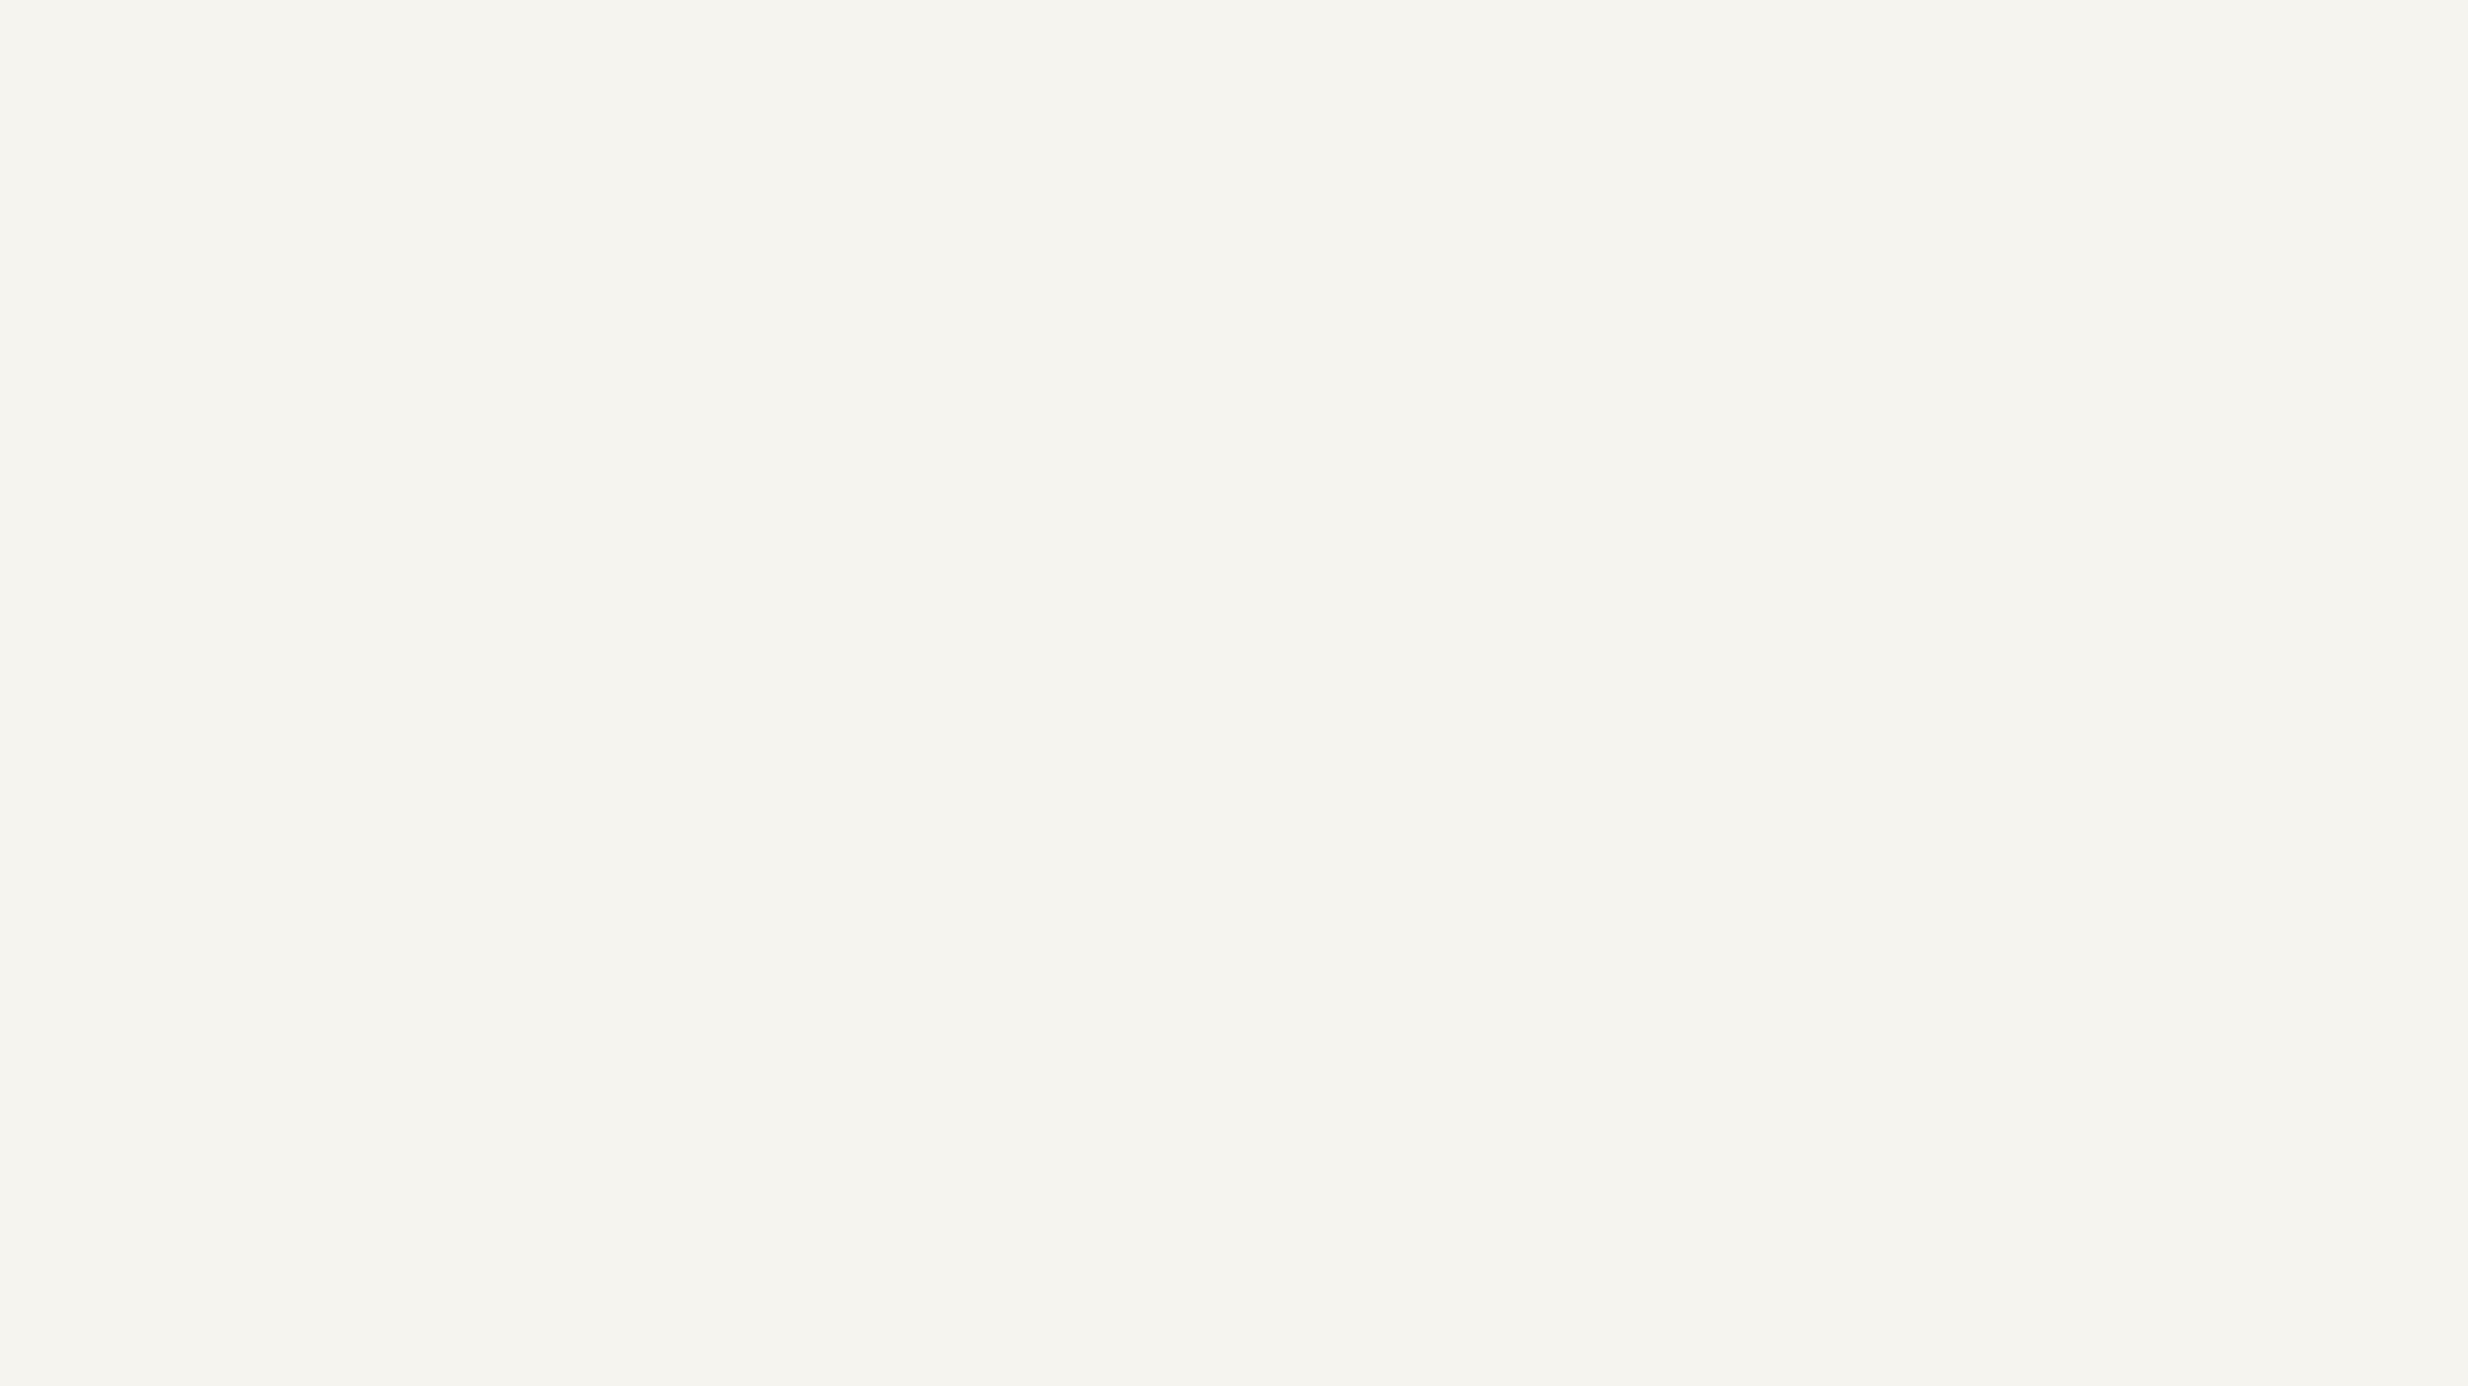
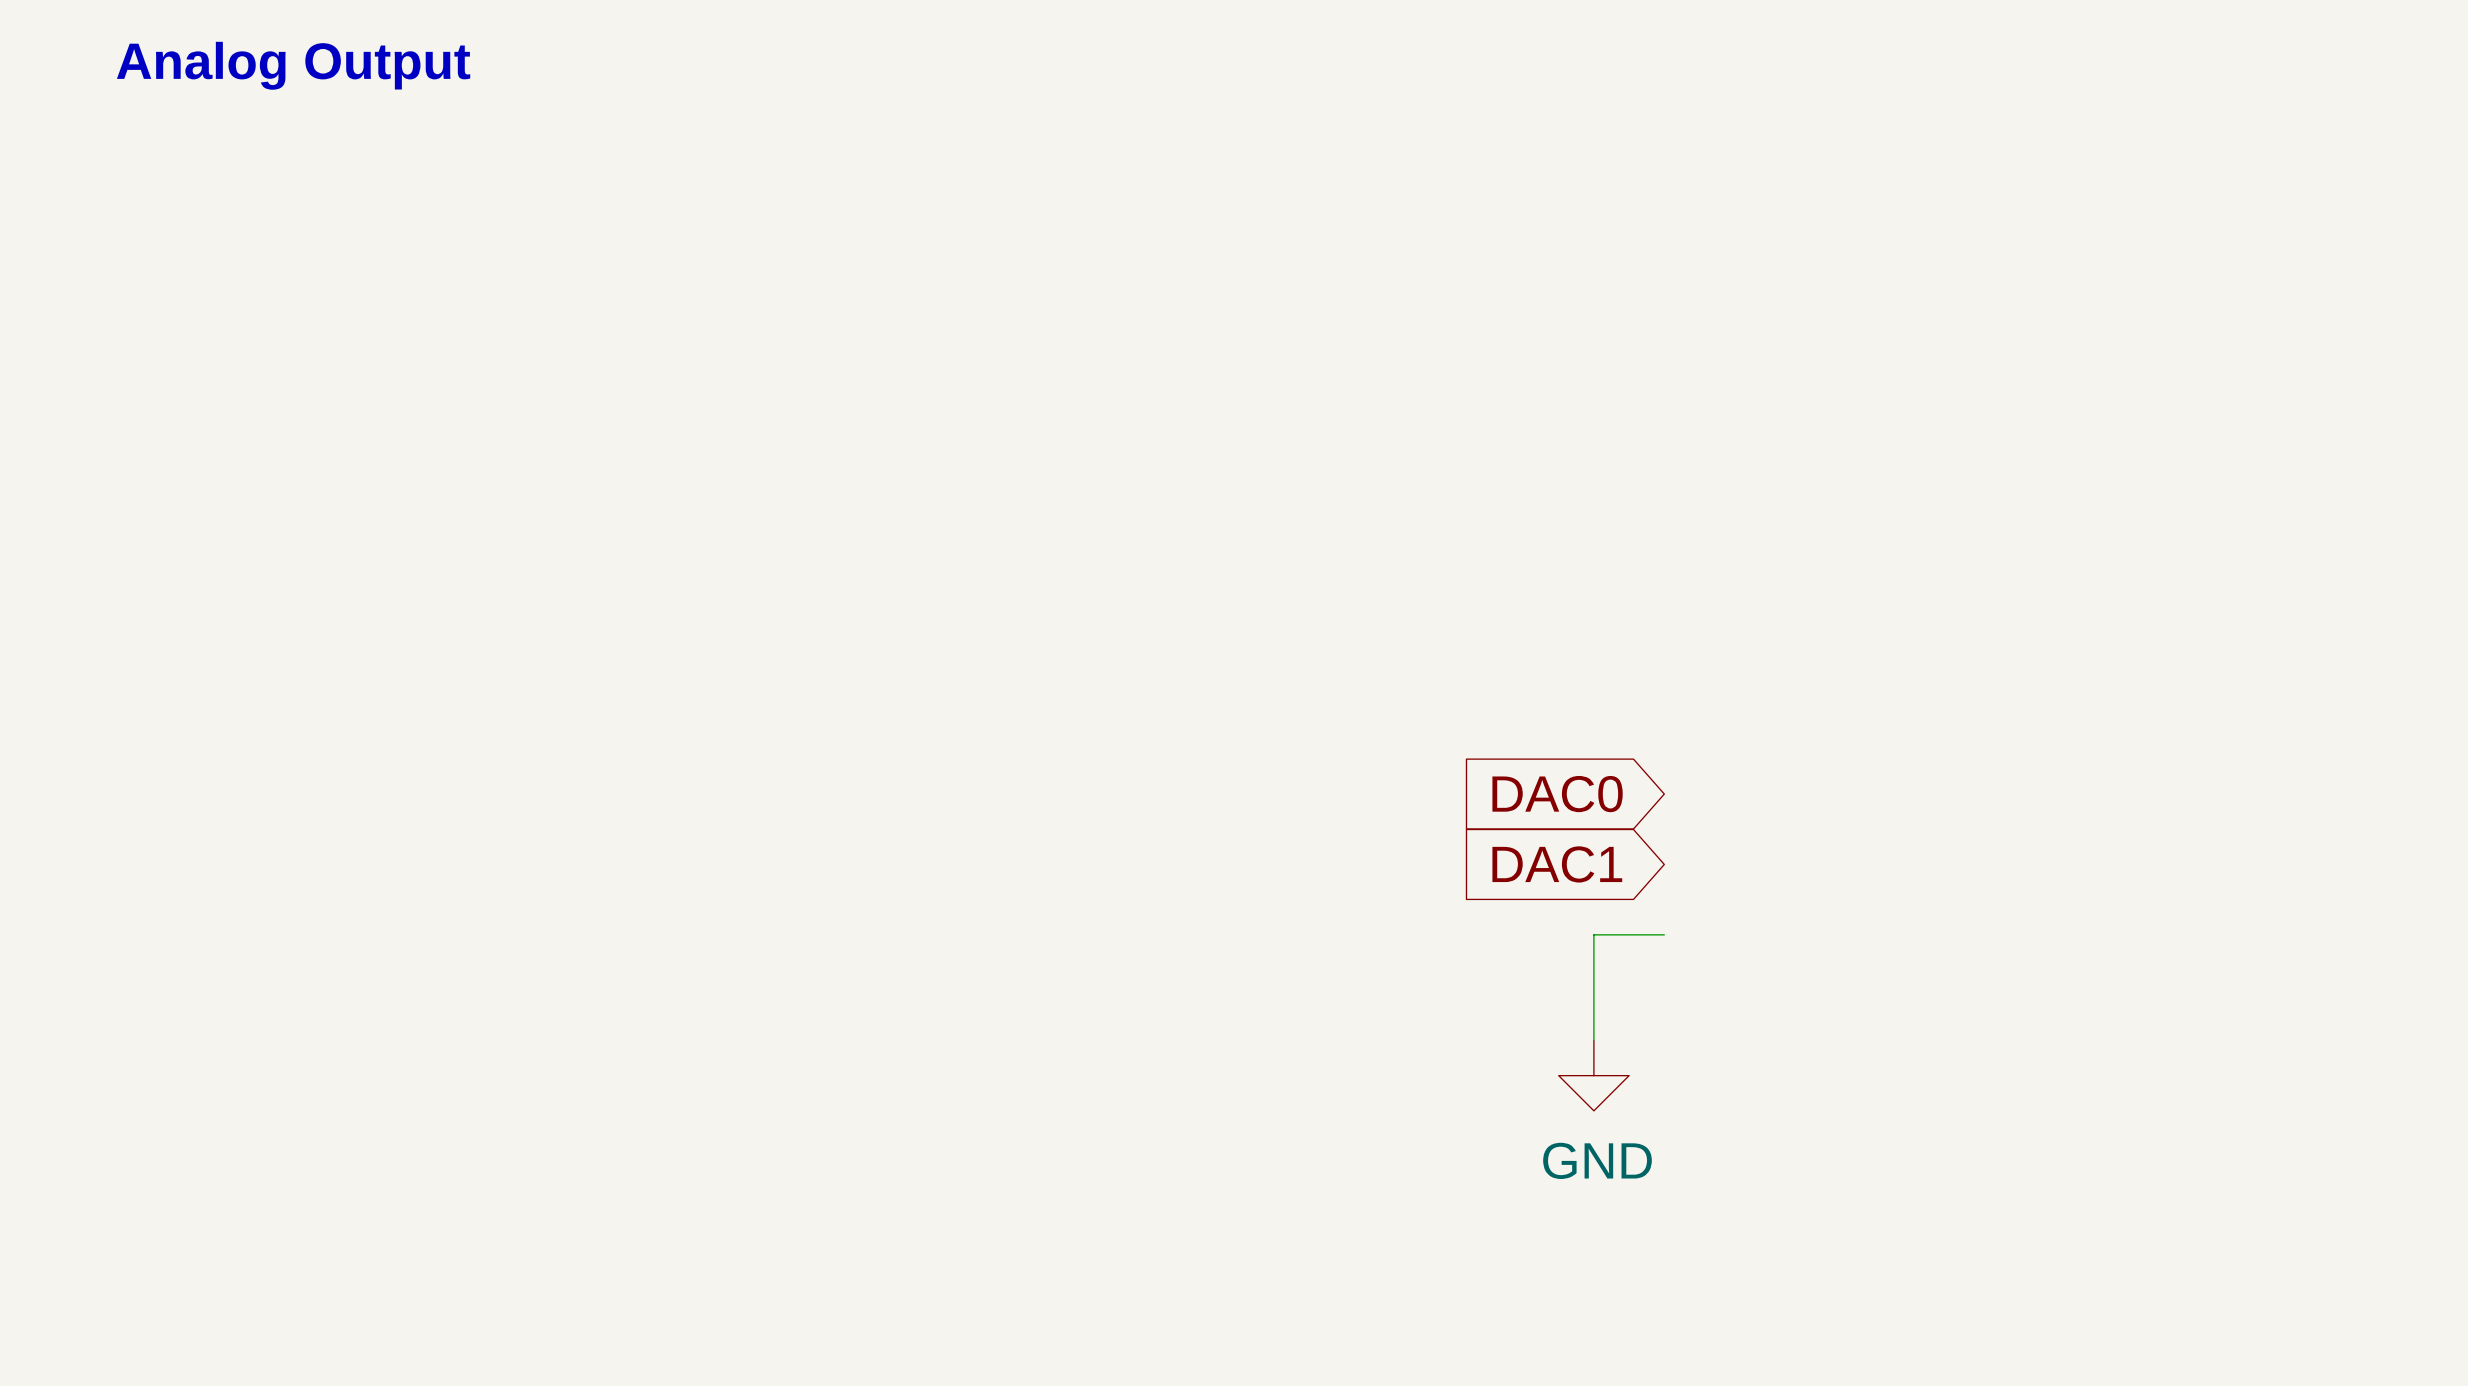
text: none -> Analog Output (293, 65)
global label: none -> DAC0 (1557, 794)
global label: none -> DAC1 (1557, 864)
wire: none -> (1664, 934) (1593, 934) (1593, 1040)
power symbol: none -> GND (1593, 1075)

